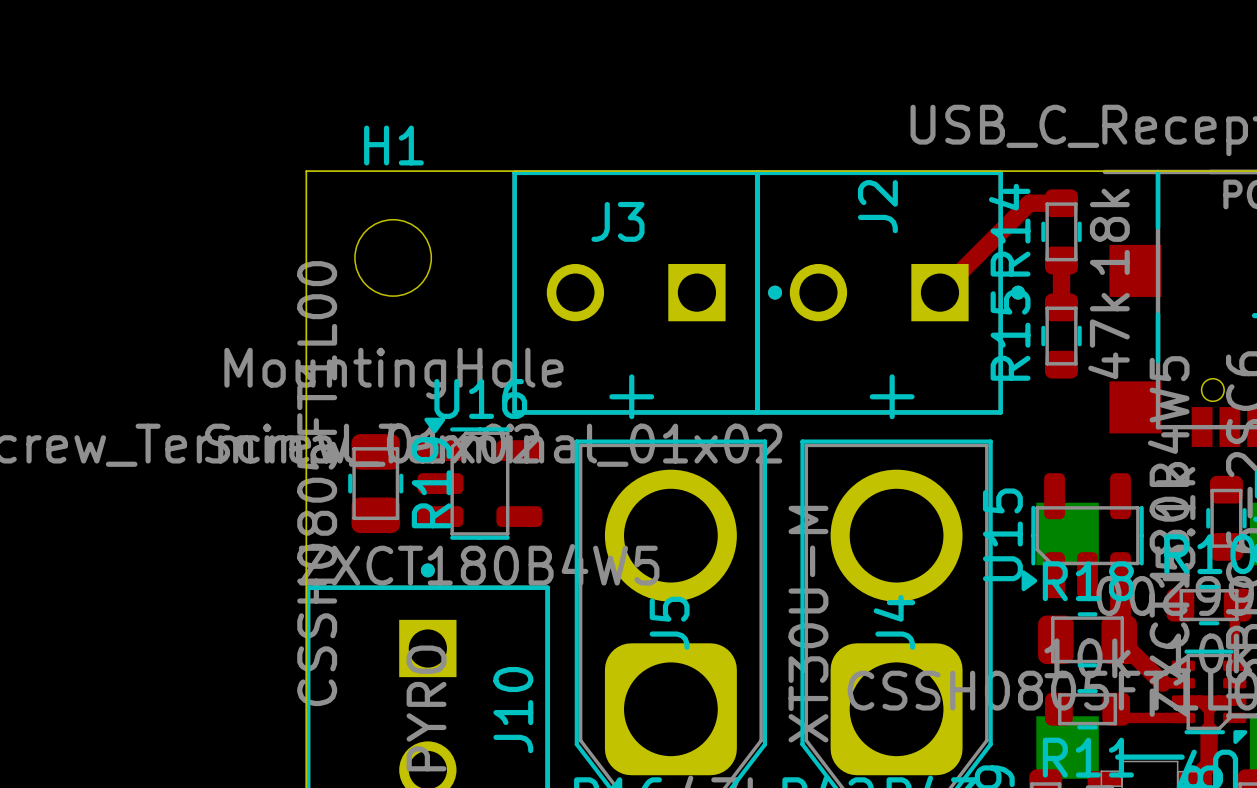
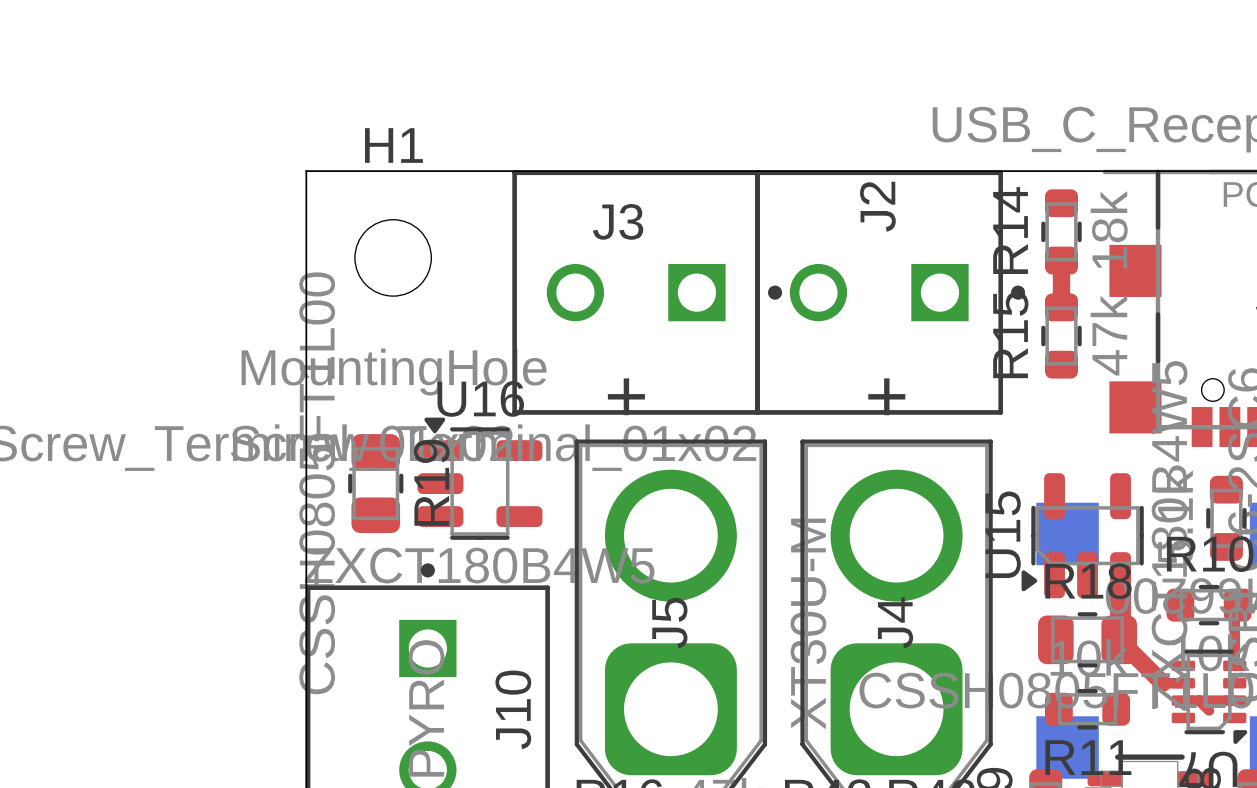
top track: (1061, 203) (1029, 203) (939, 292) -> none
top track: (1219, 700) (1209, 710) (1209, 764) (1194, 779) -> none
top track: (1116, 709) (1124, 717) (1183, 717) -> none

